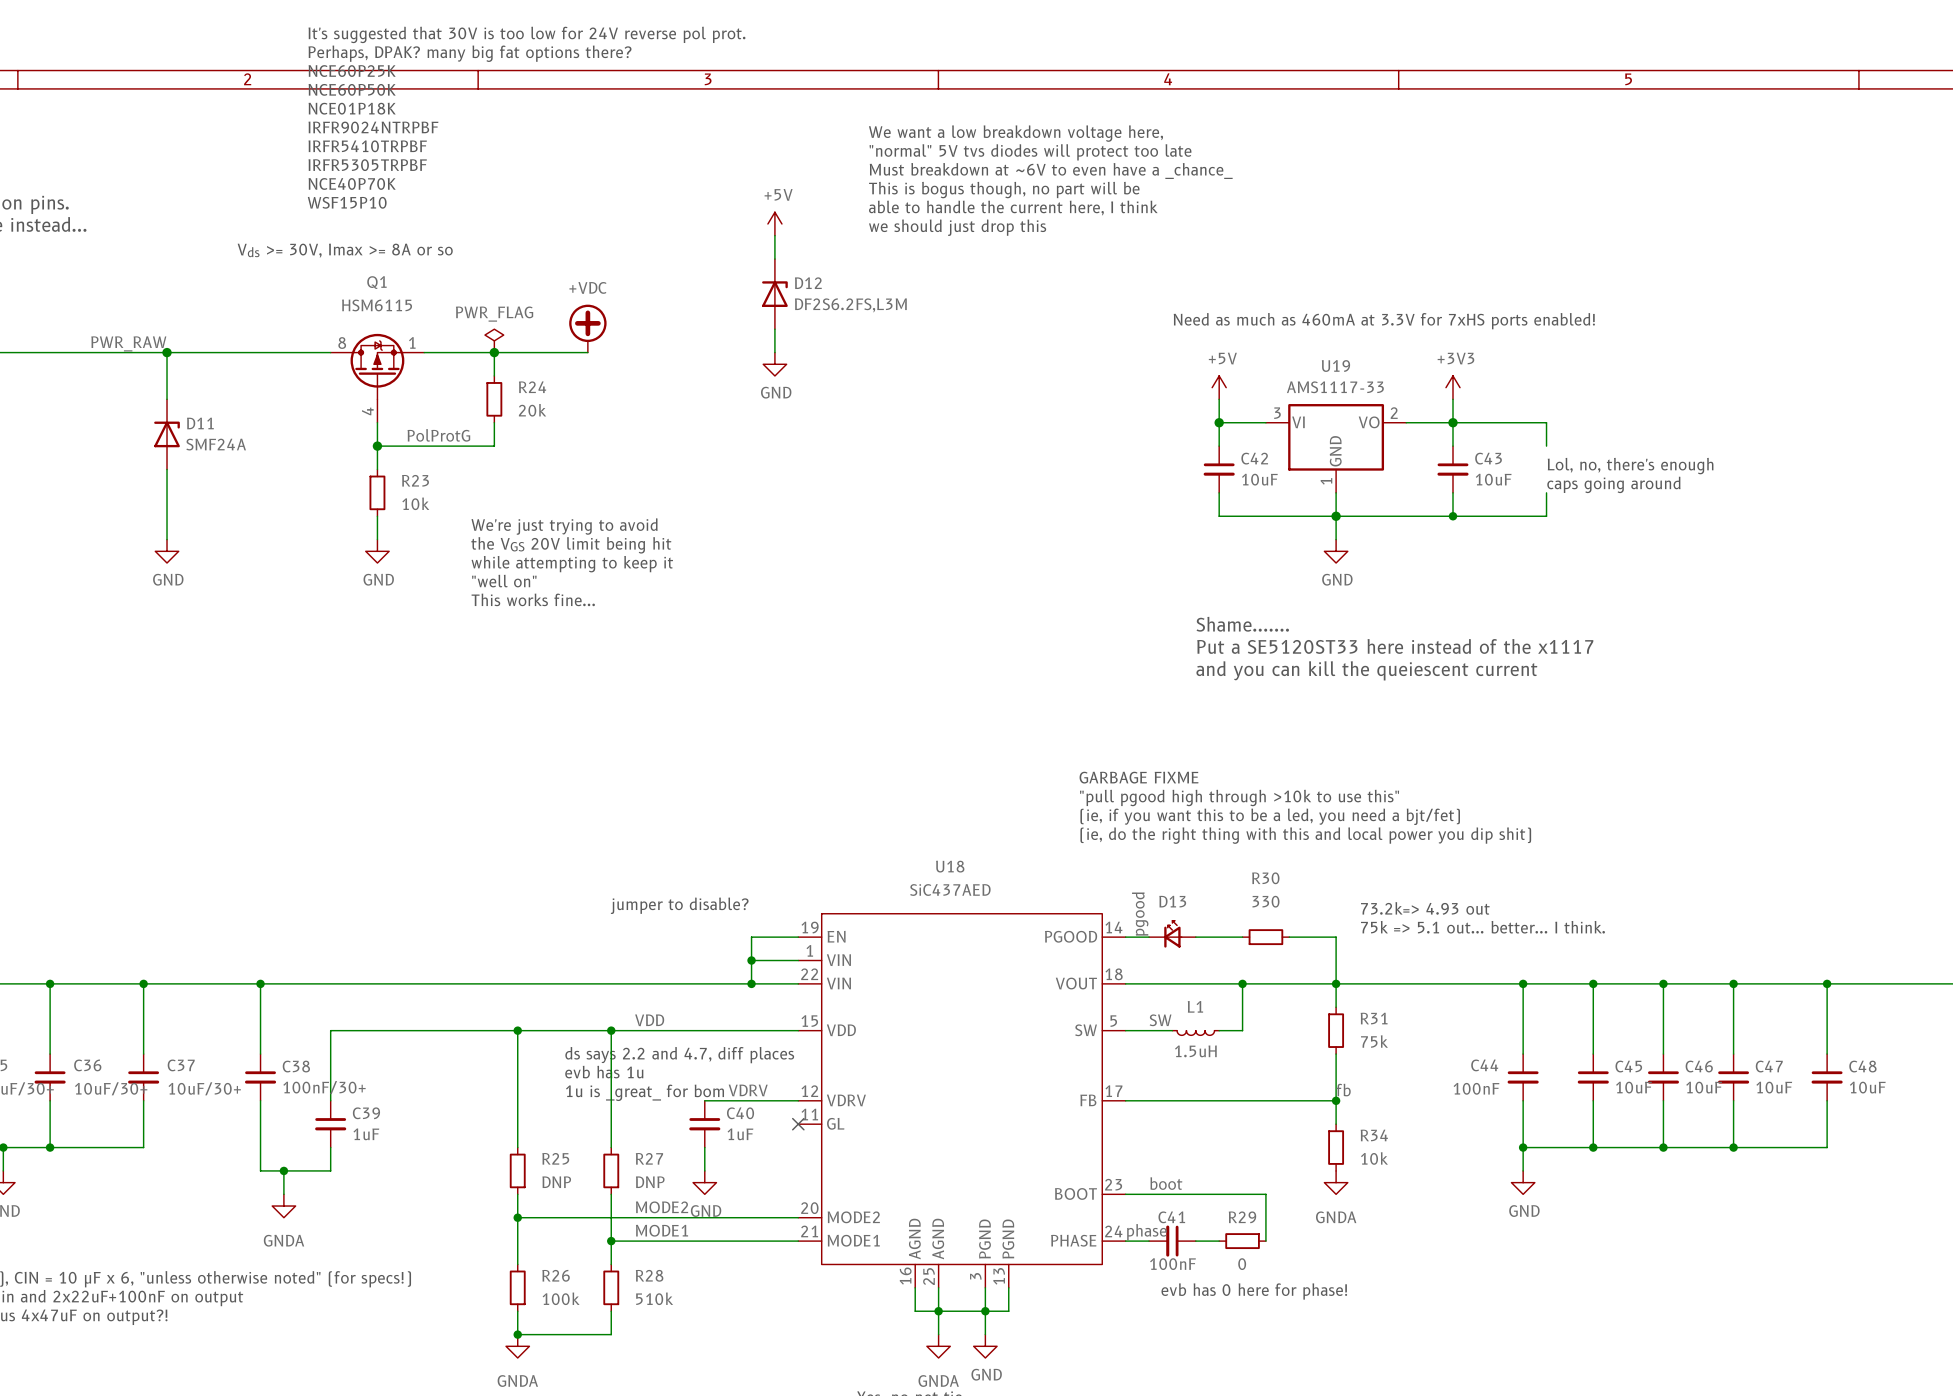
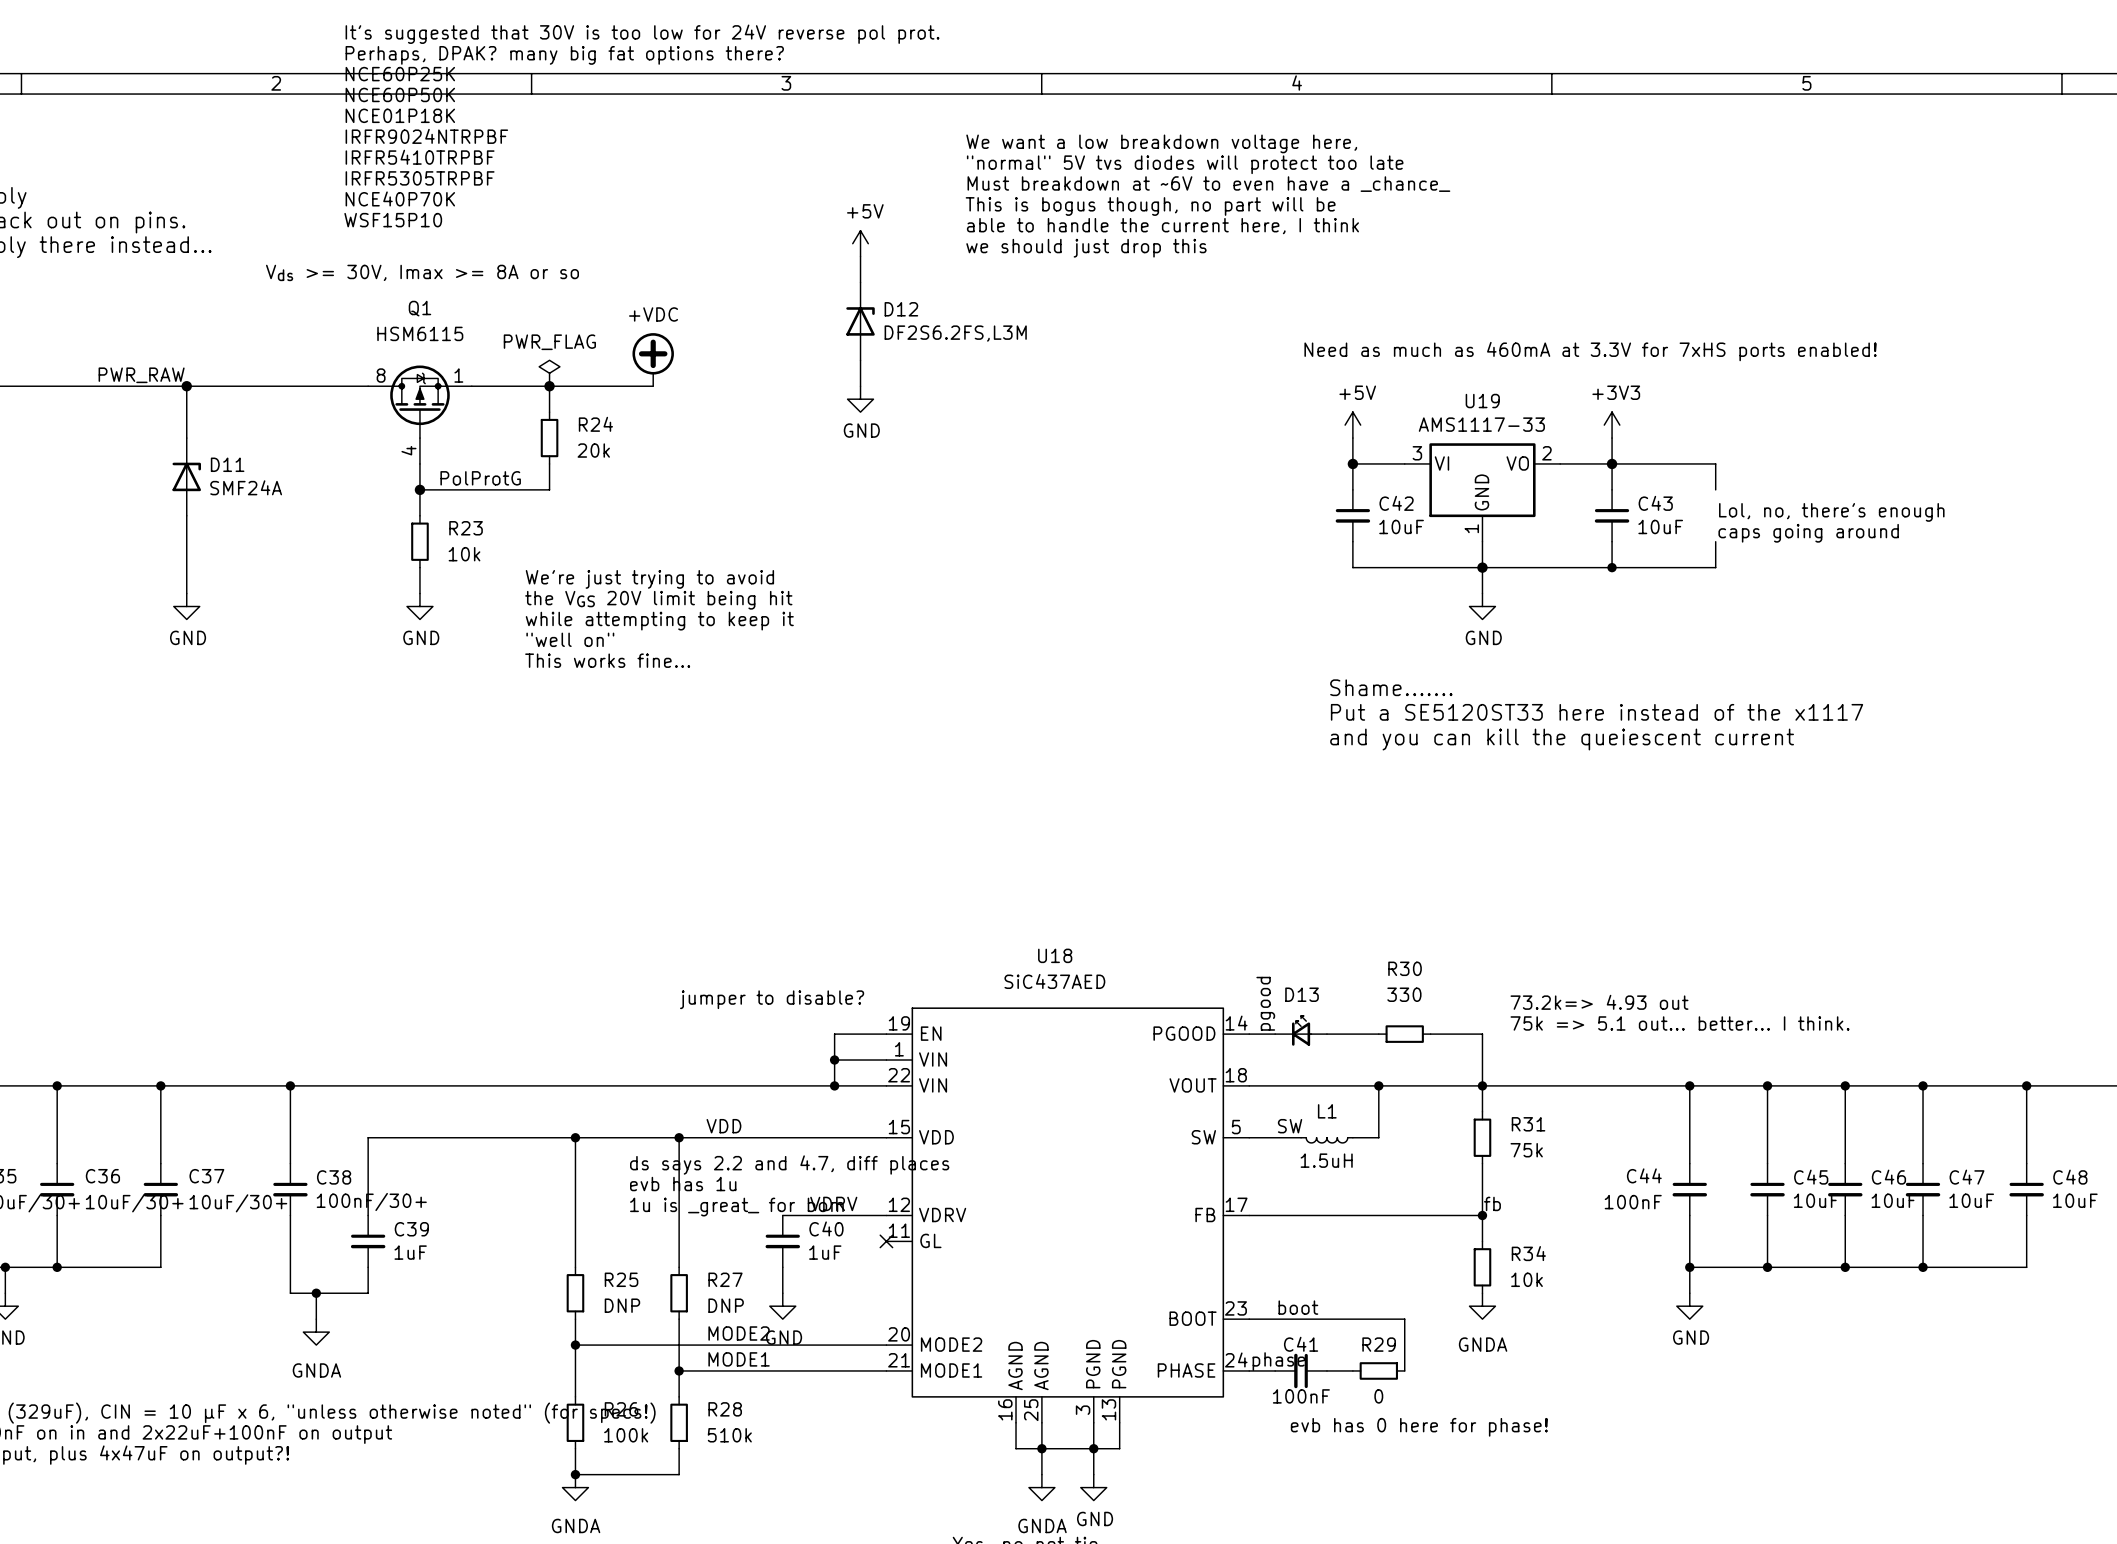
text: GARBAGE FIXME (1139, 777) -> none
text: "pull pgood high through >10k to use this" (1239, 797) -> none
text: (ie, if you want this to be a led, you need a bjt/fet) (1270, 816) -> none
text: (ie, do the right thing with this and local power you dip shit) (1305, 835) -> none

